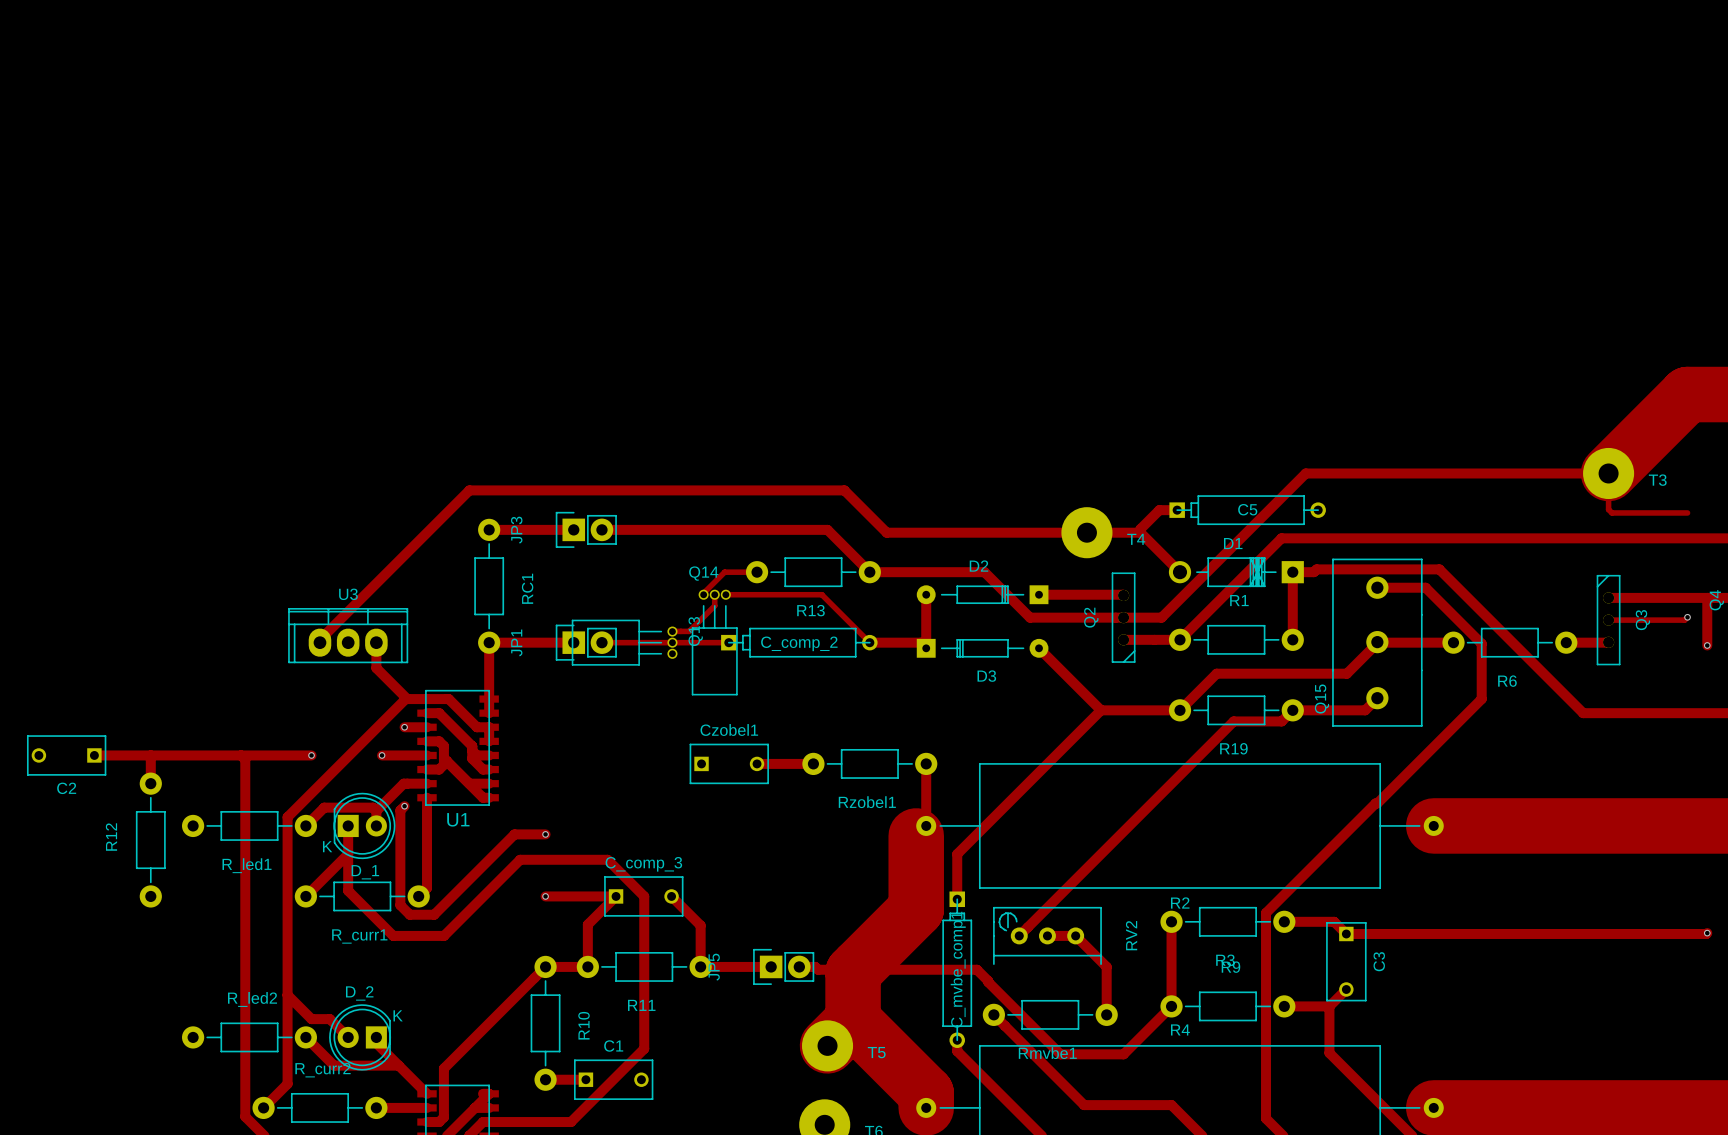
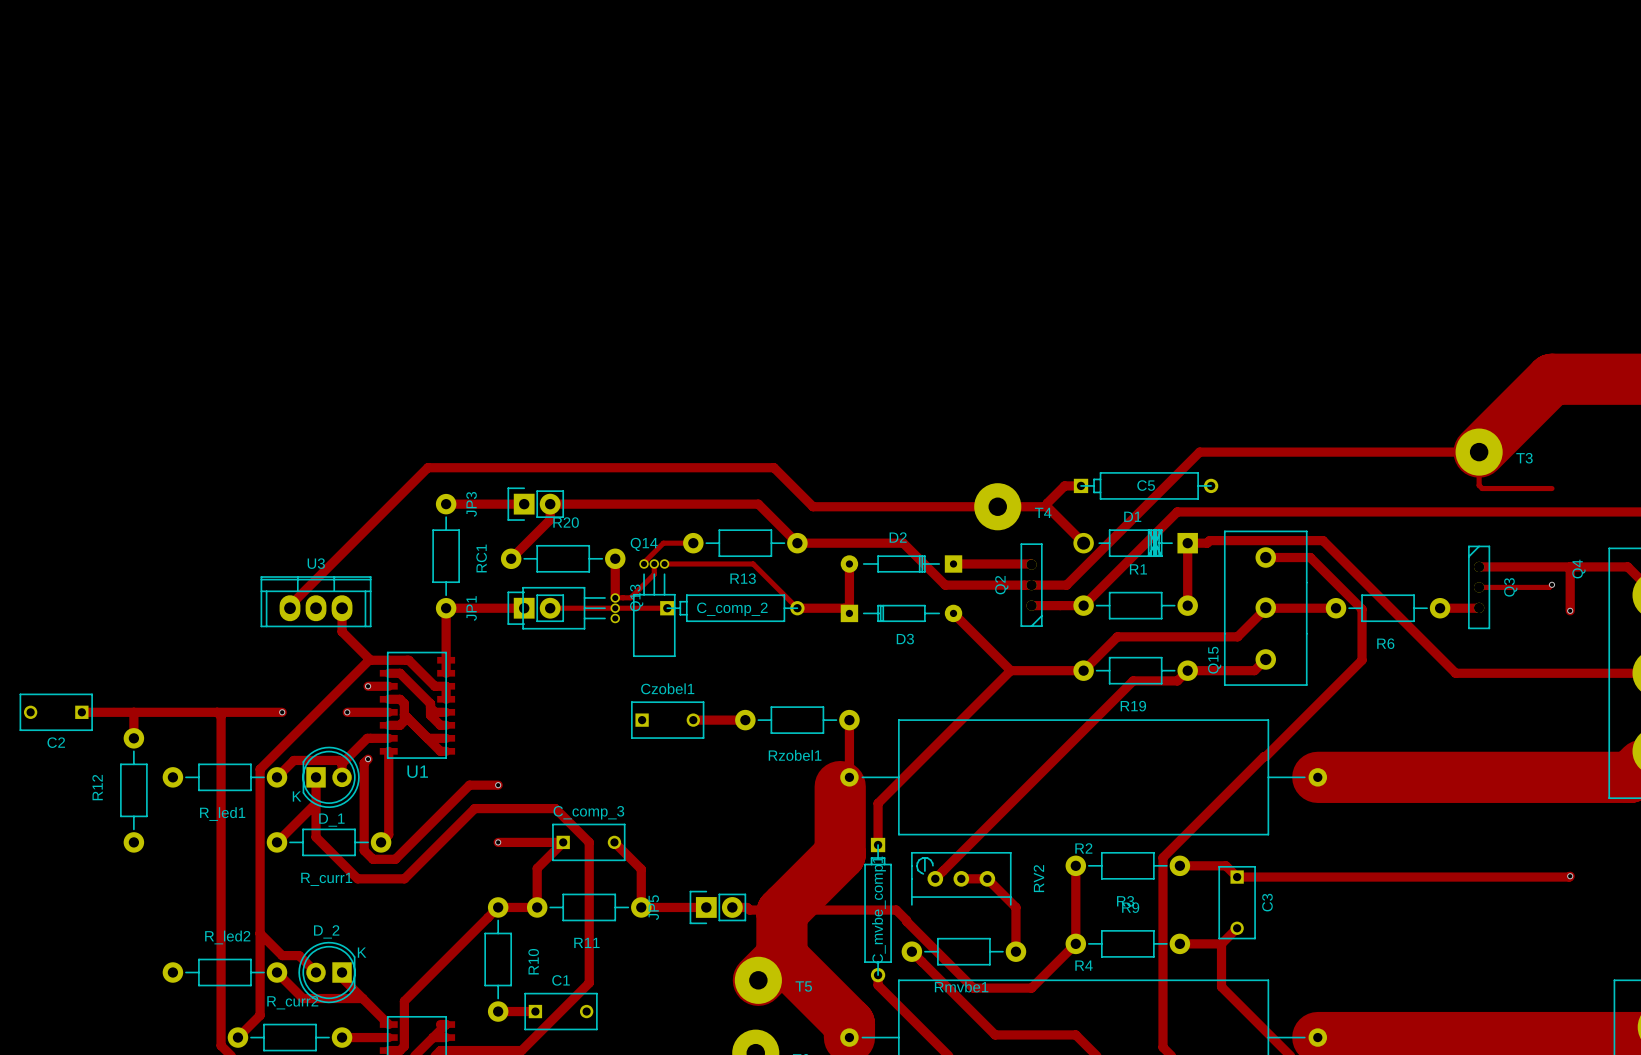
track: none -> (550, 504) (550, 519) (511, 558)
R20: none -> (563, 558)
track: none -> (615, 558) (615, 597)

